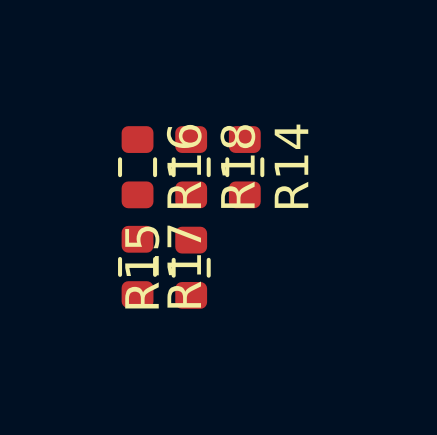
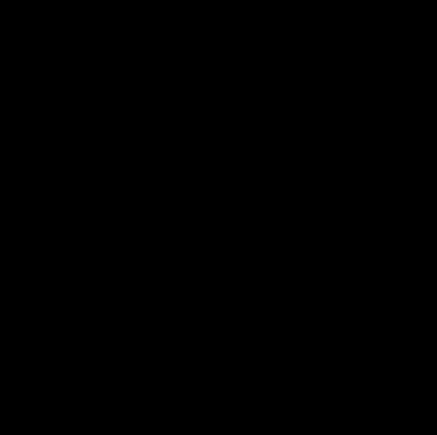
R16: (137, 167) -> none
R18: (191, 167) -> none
R14: (244, 167) -> none
R17: (137, 266) -> none
R15: (191, 267) -> none

